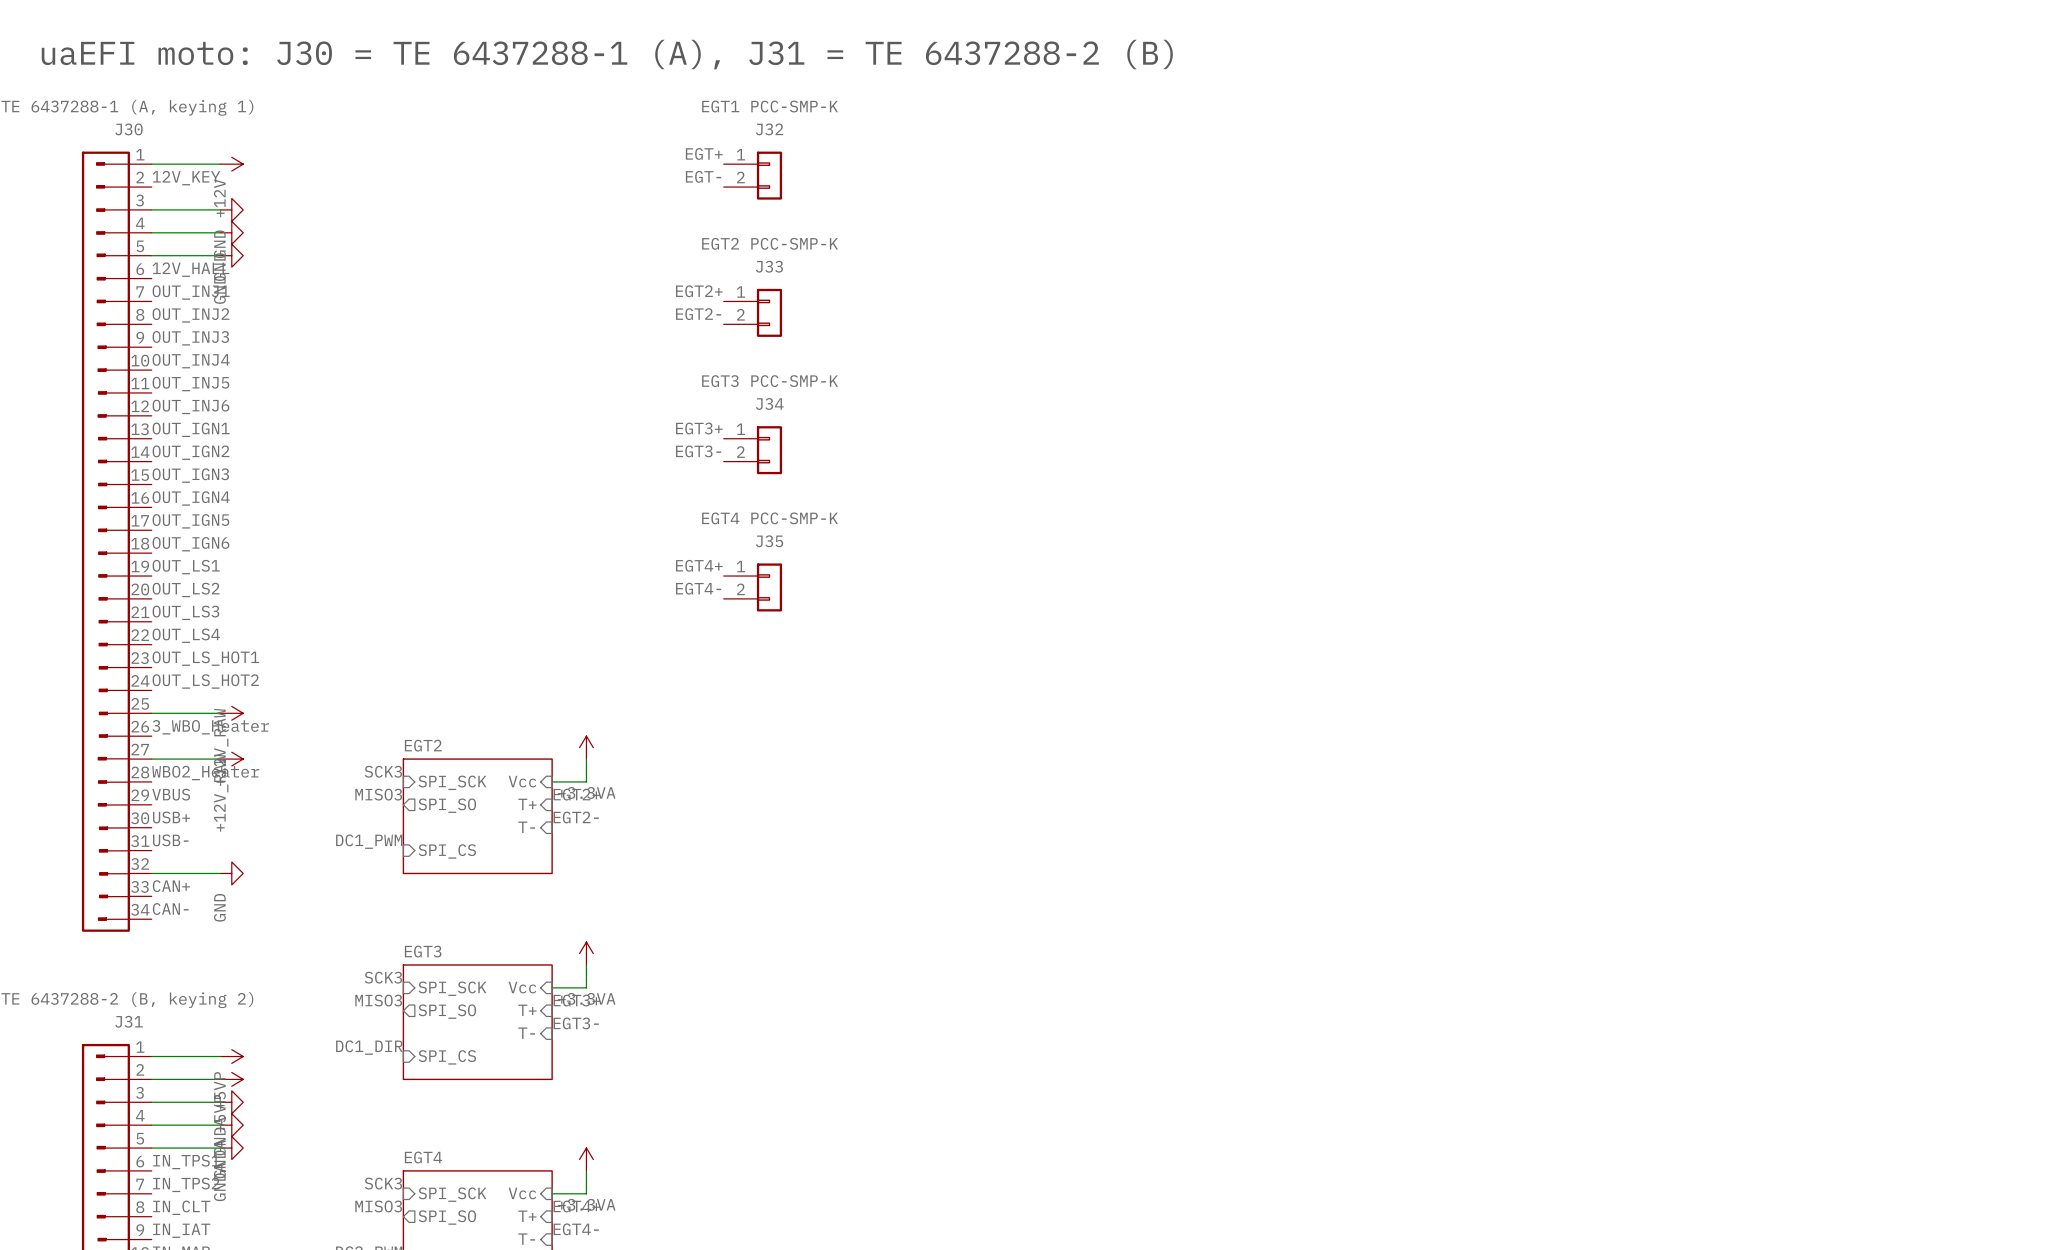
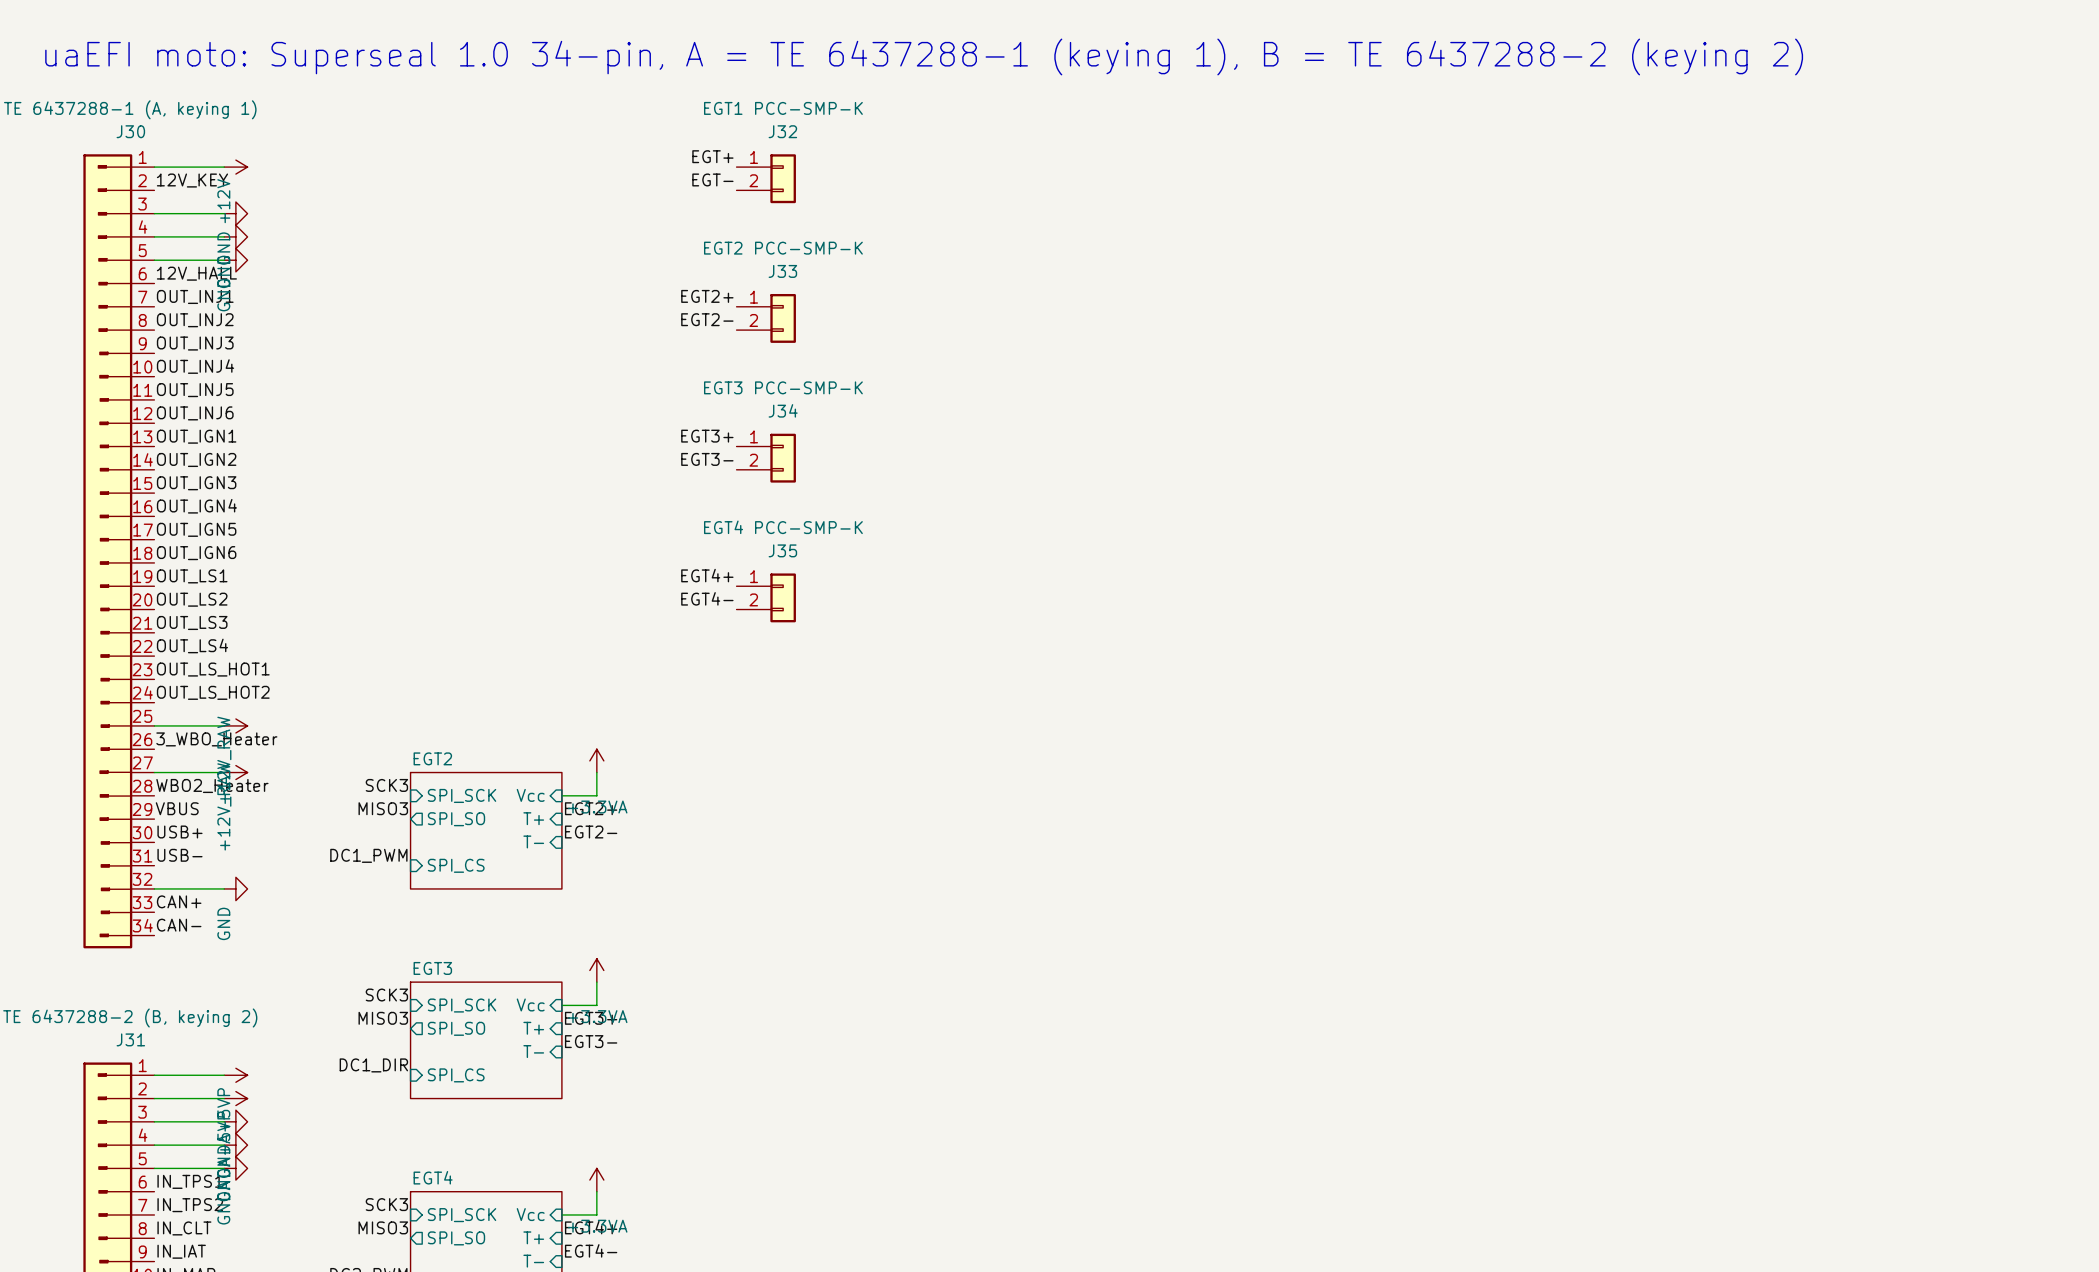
text: uaEFI moto: J30 = TE 6437288-1 (A), J31 = TE 6437288-2 (B) (607, 54) -> uaEFI moto: Superseal 1.0 34-pin, A = TE 6437288-1 (keying 1), B = TE 6437288-2 (keying 2) (924, 56)

